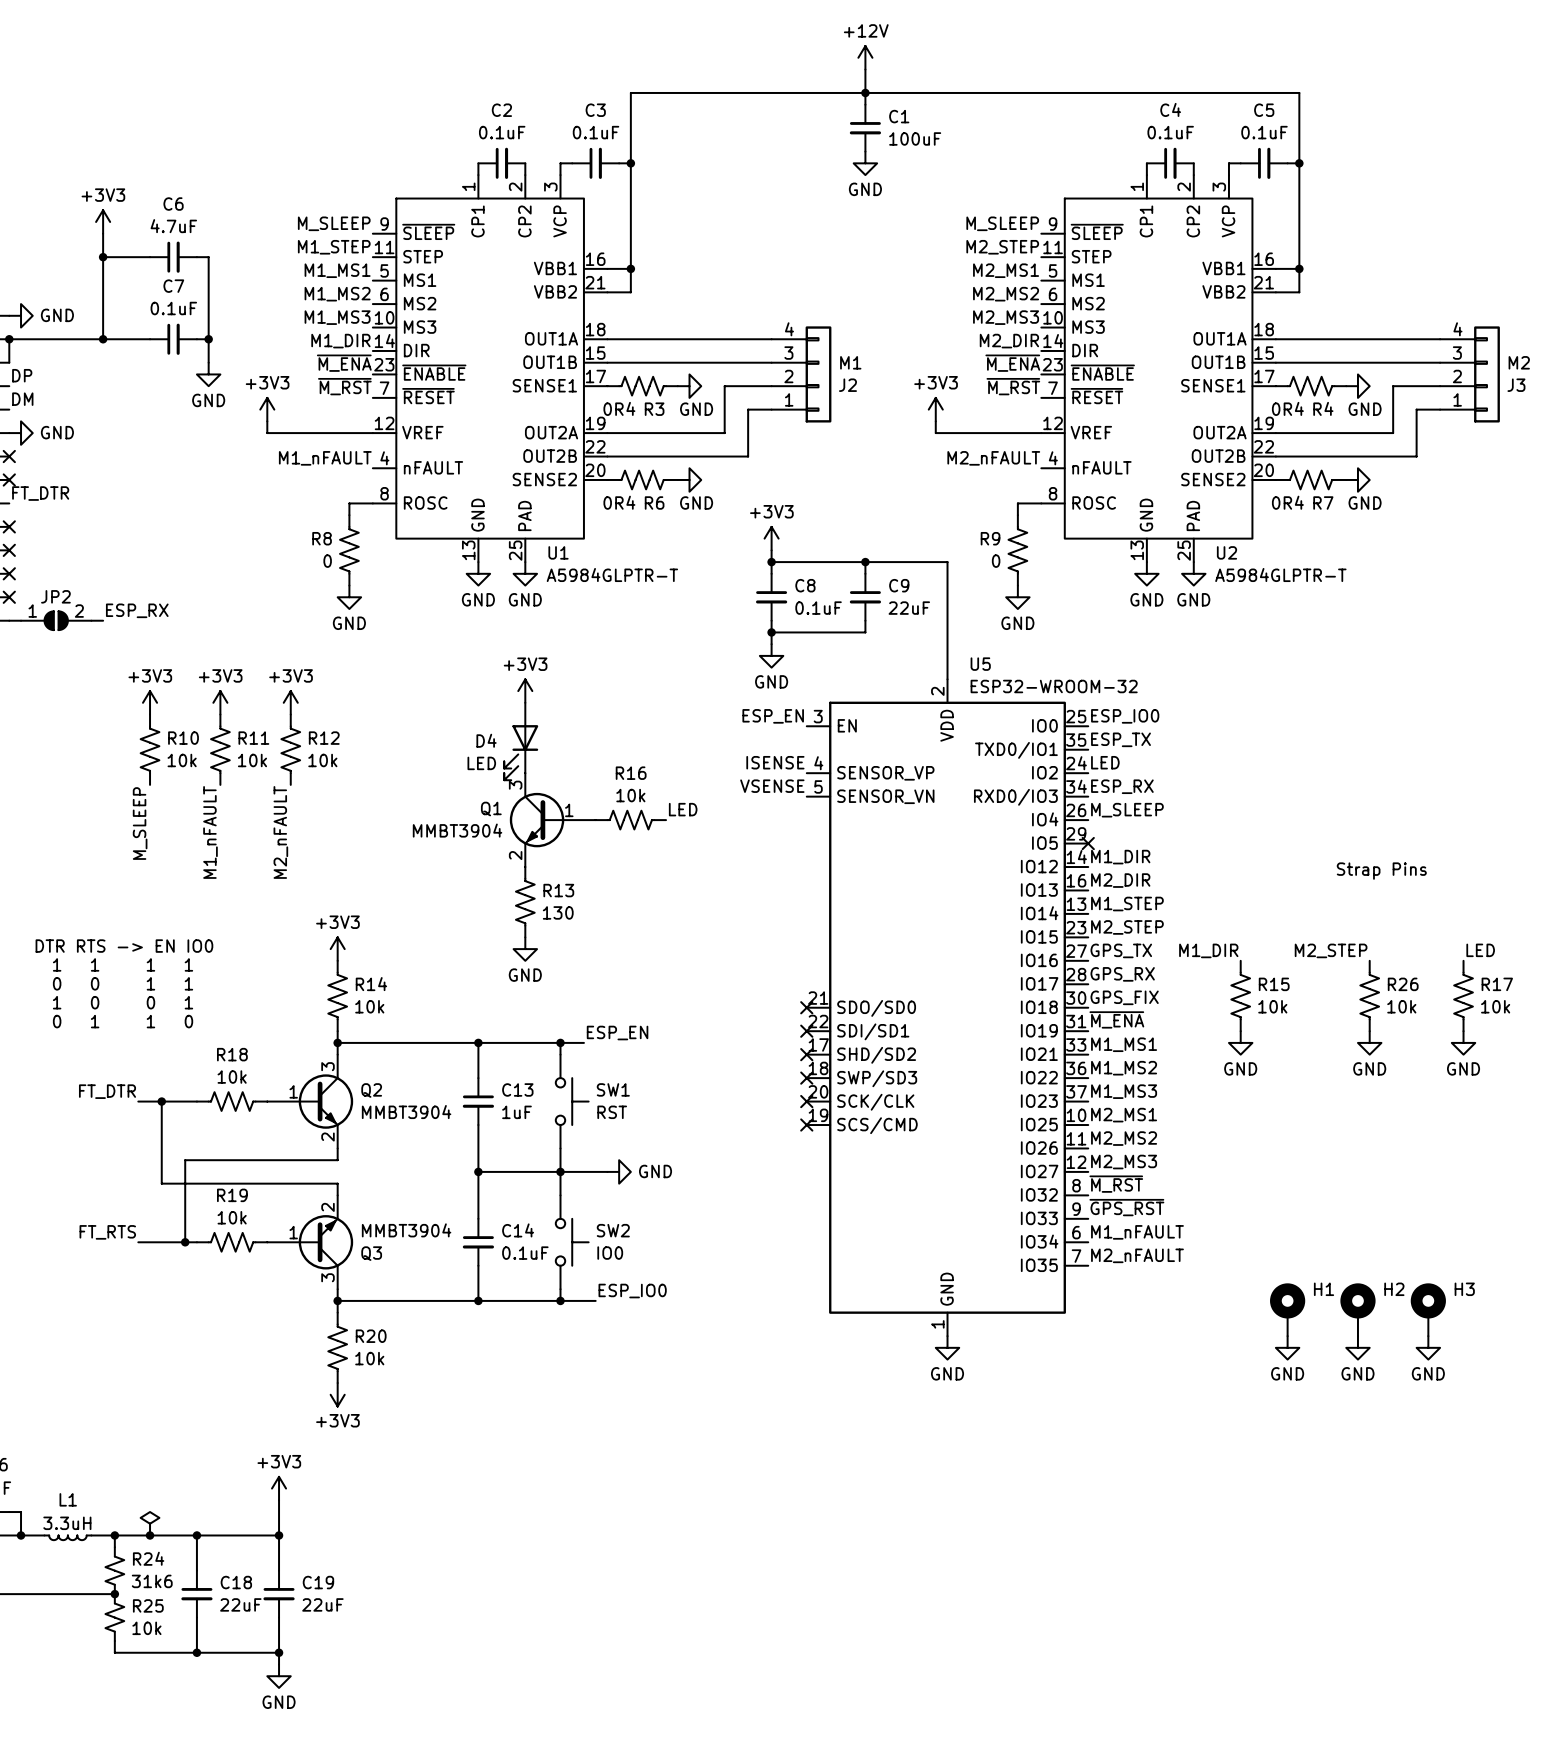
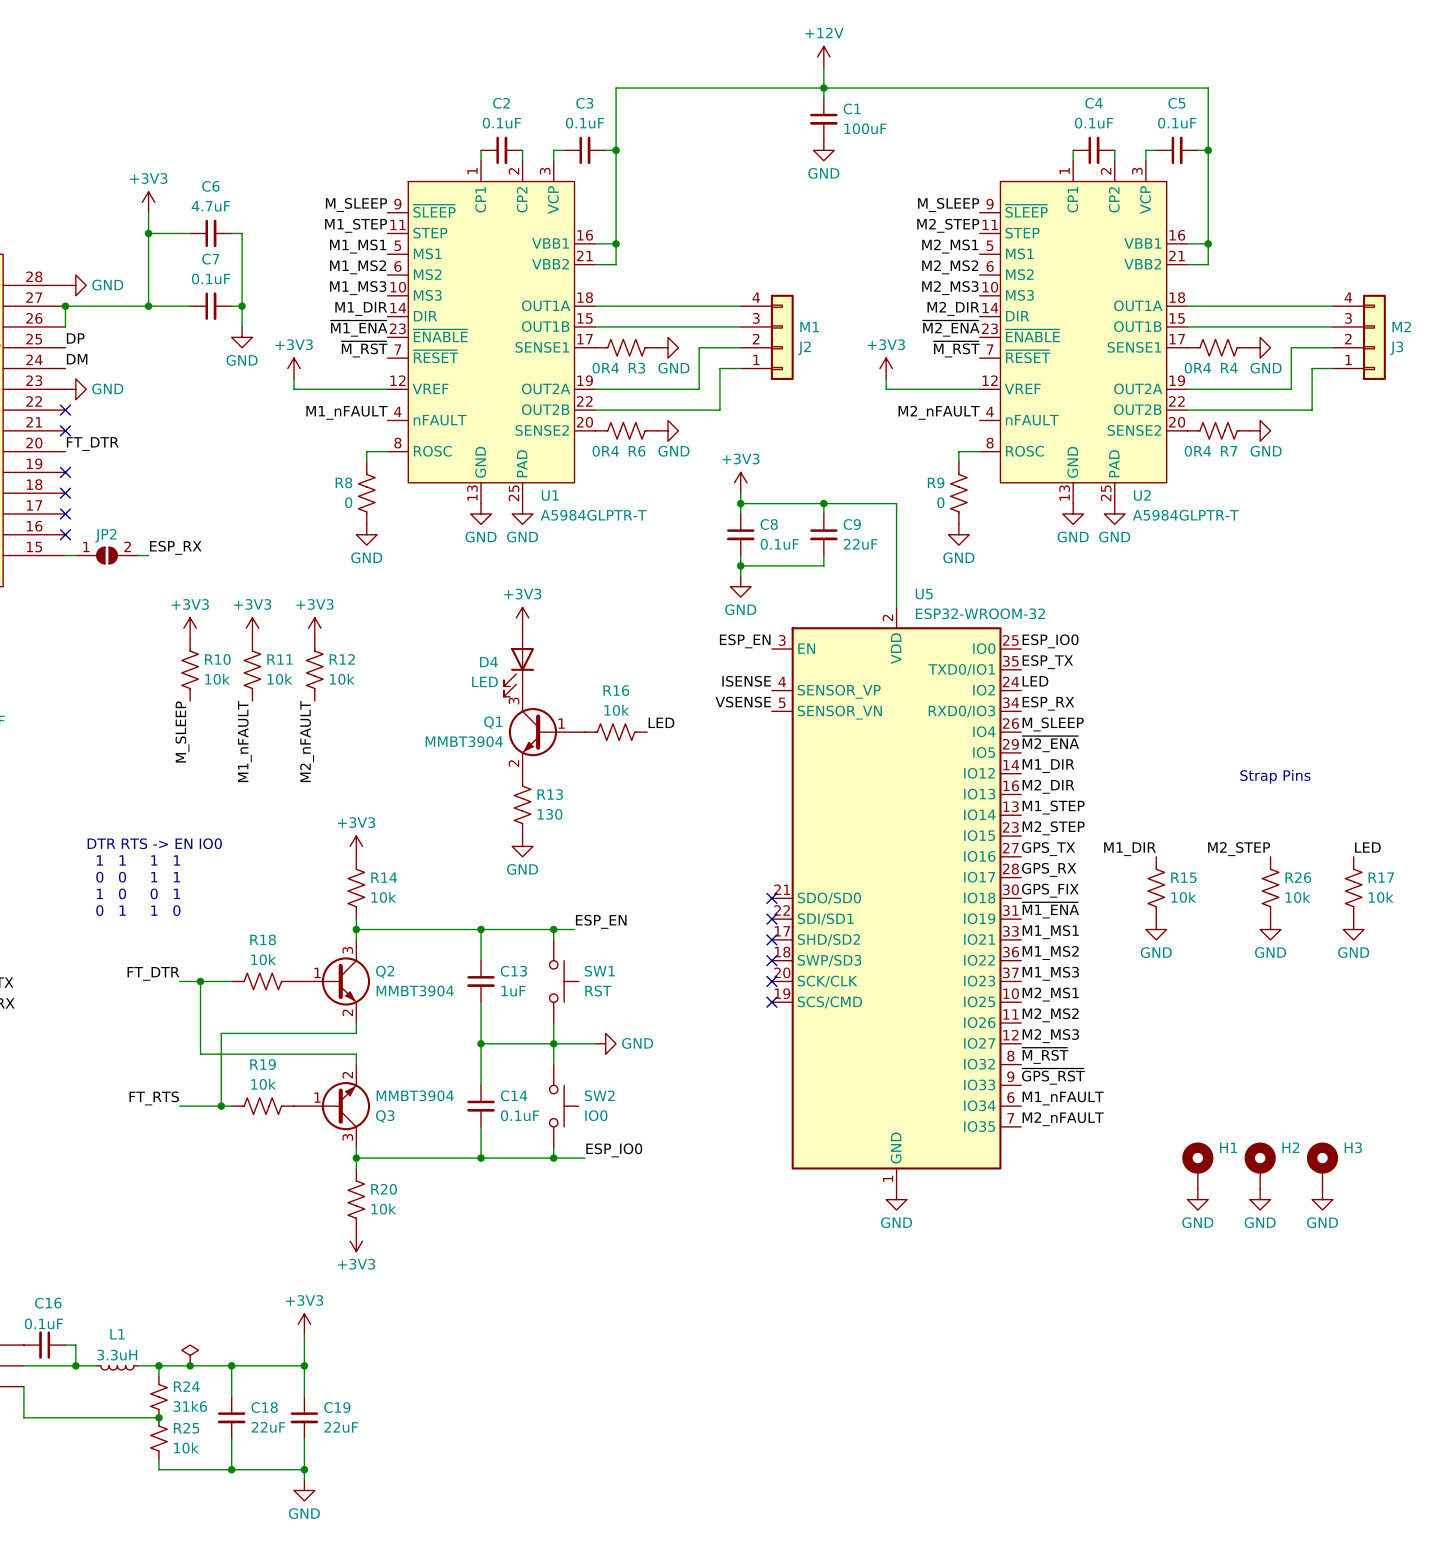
label: ~{M_ENA} (344, 363) -> ~{M1_ENA} (359, 328)
label: ~{M_ENA} (1012, 363) -> ~{M2_ENA} (951, 328)
label: none -> ~{M2_ENA} (1050, 744)
no-connect mark: (1088, 843) -> none
label: ~{M_ENA} (1116, 1019) -> ~{M1_ENA} (1050, 910)

